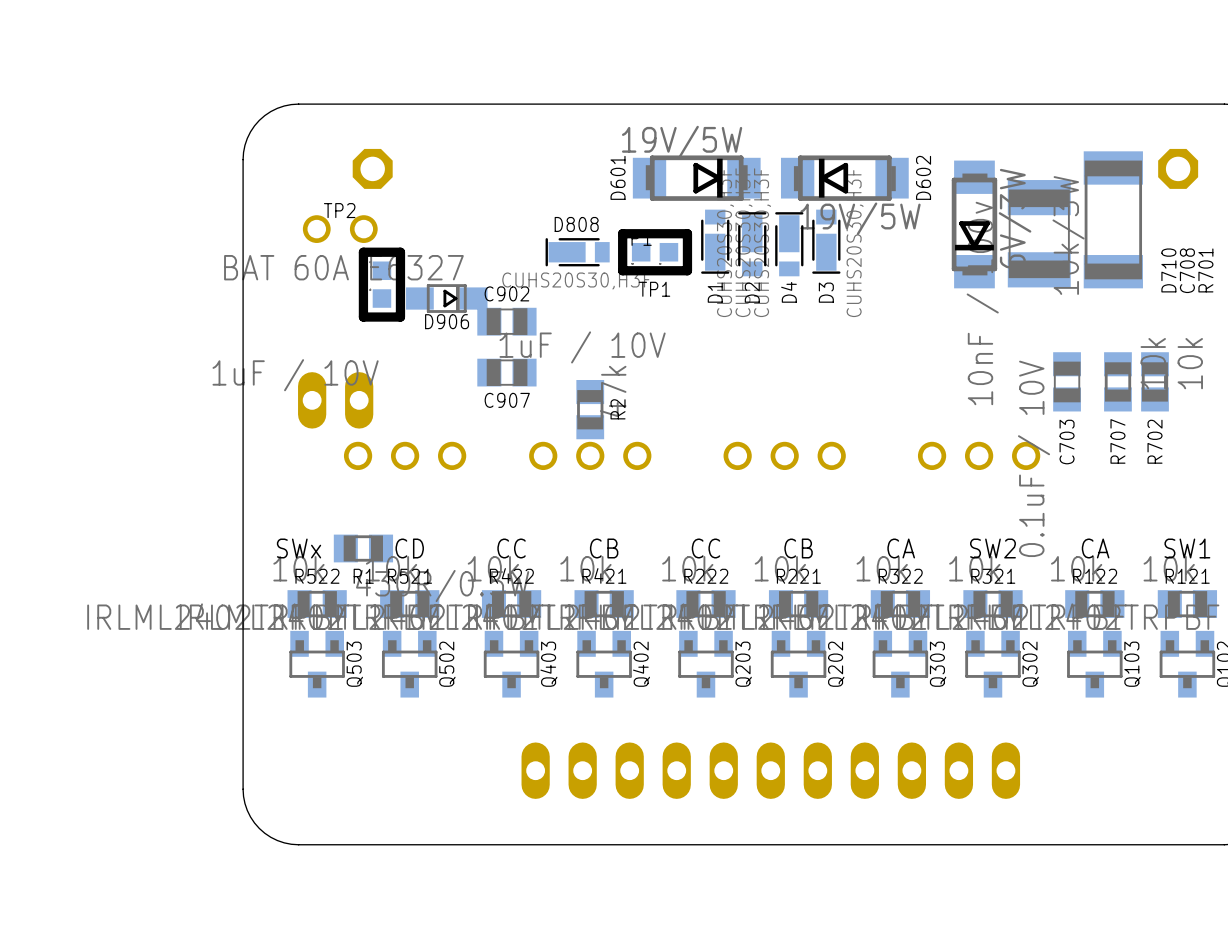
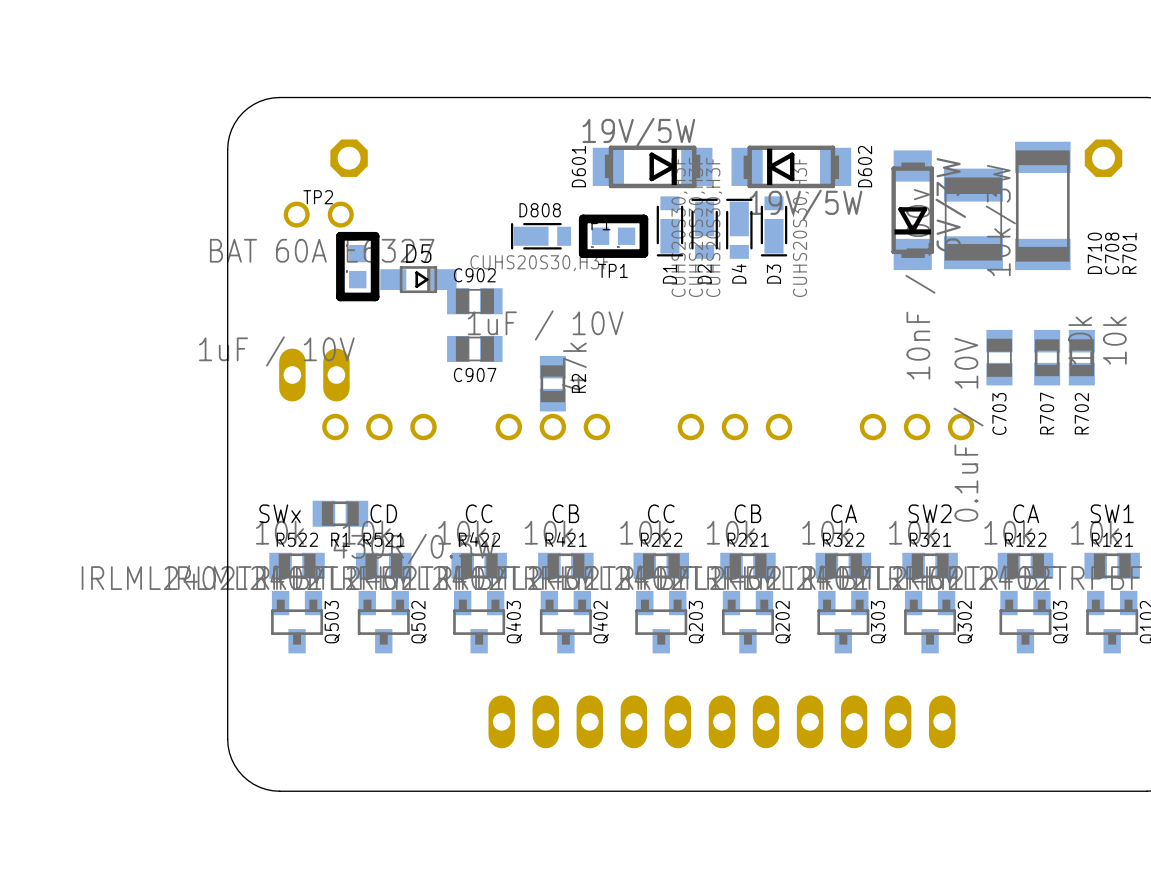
D906 name: D906 (447, 321) -> D5 (418, 253)

